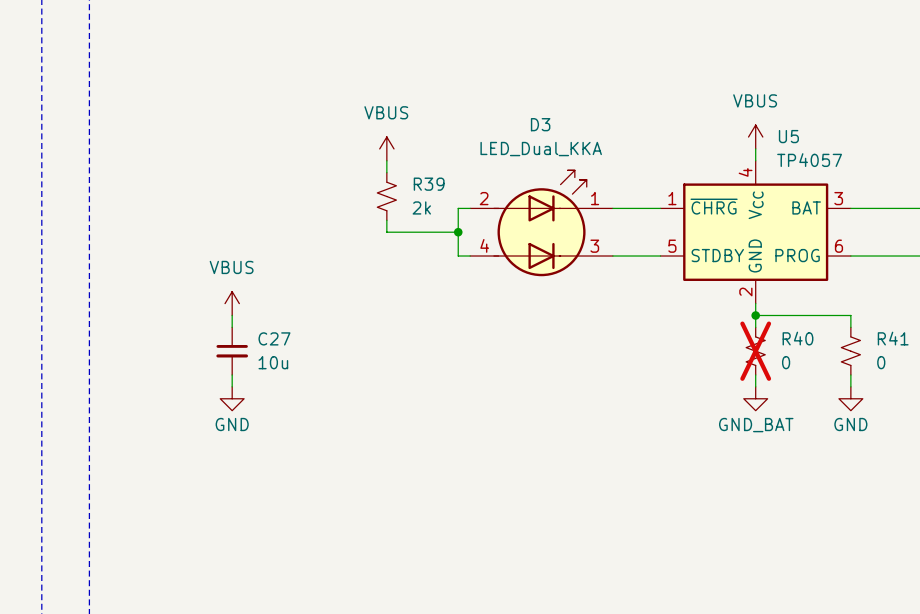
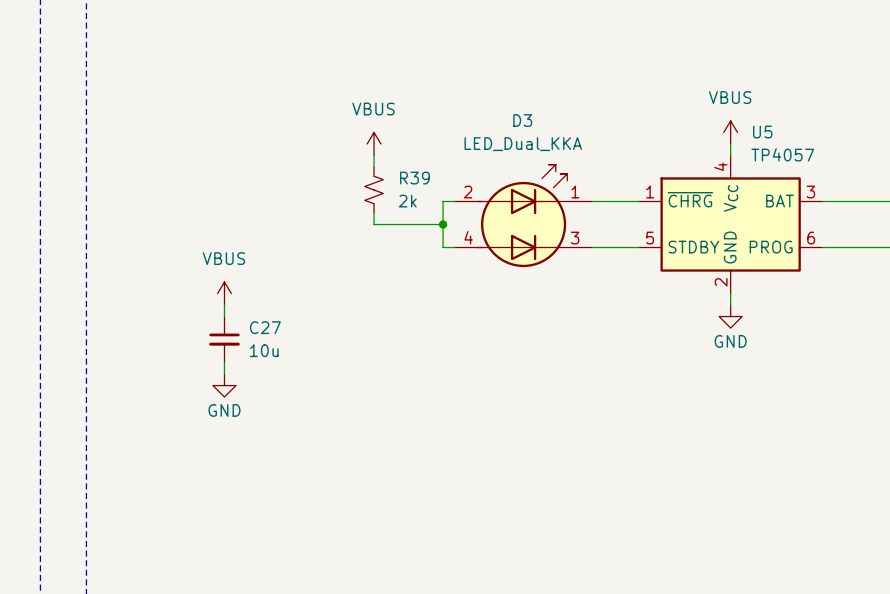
junction: (755, 315) -> none
wire: (755, 327) (755, 315) (850, 315) (850, 327) -> none
power symbol: none -> GND (730, 316)
R40: 0 (755, 351) -> none
R41: 0 (850, 351) -> none
wire: (755, 374) (755, 386) -> none
wire: (850, 374) (850, 386) -> none
power symbol: GND_BAT (755, 398) -> none
power symbol: GND (850, 398) -> none

